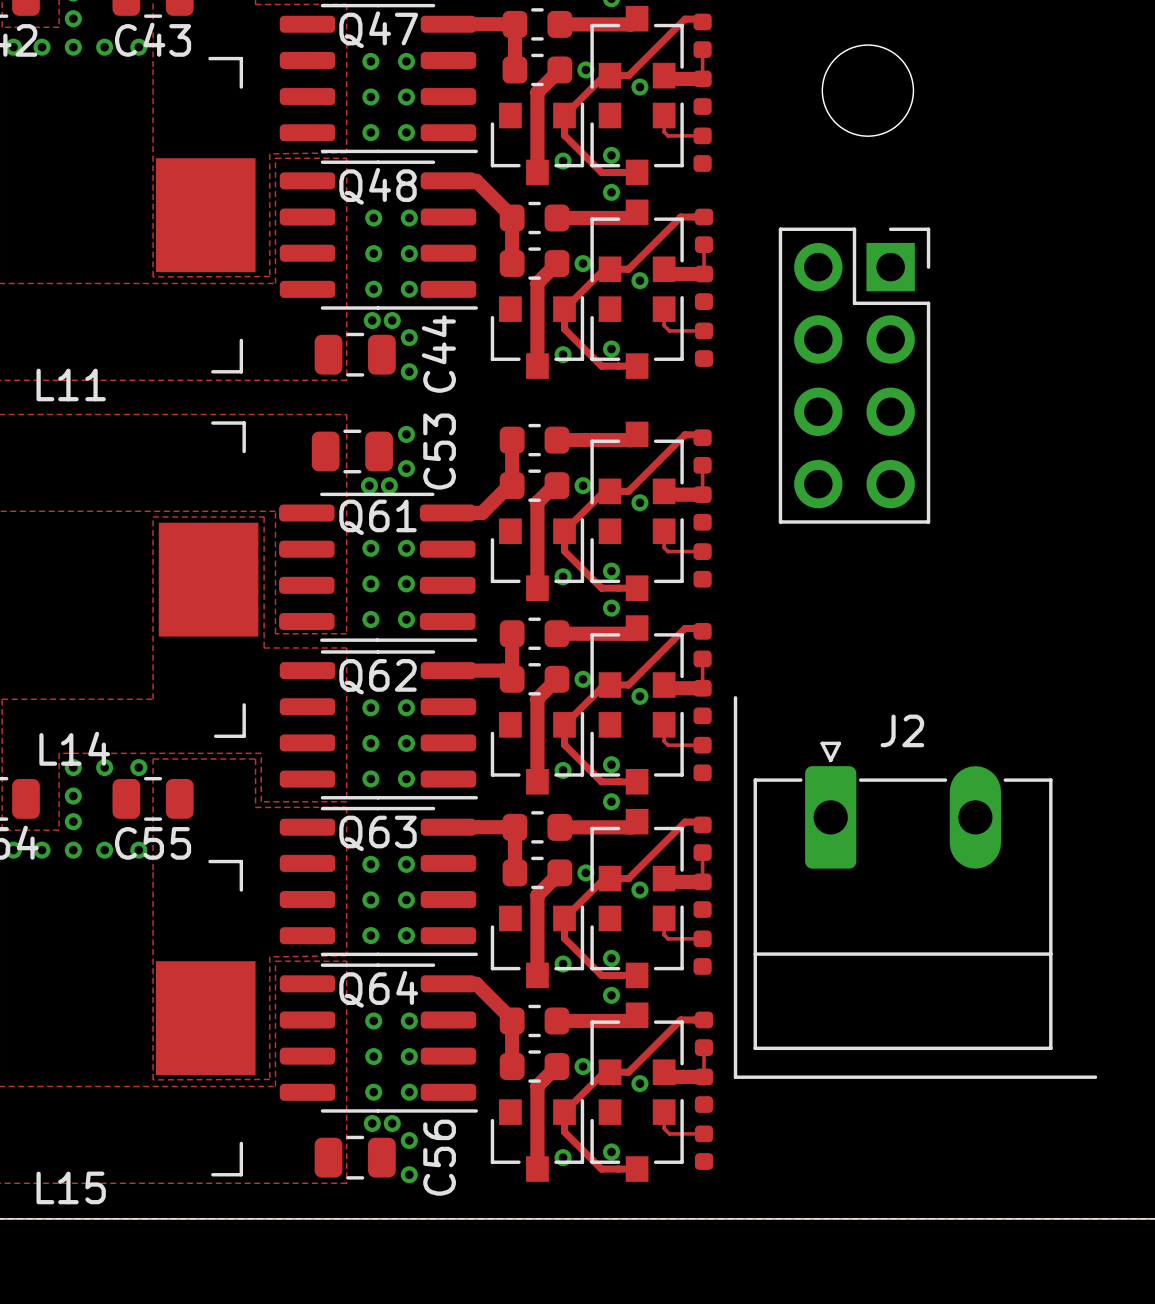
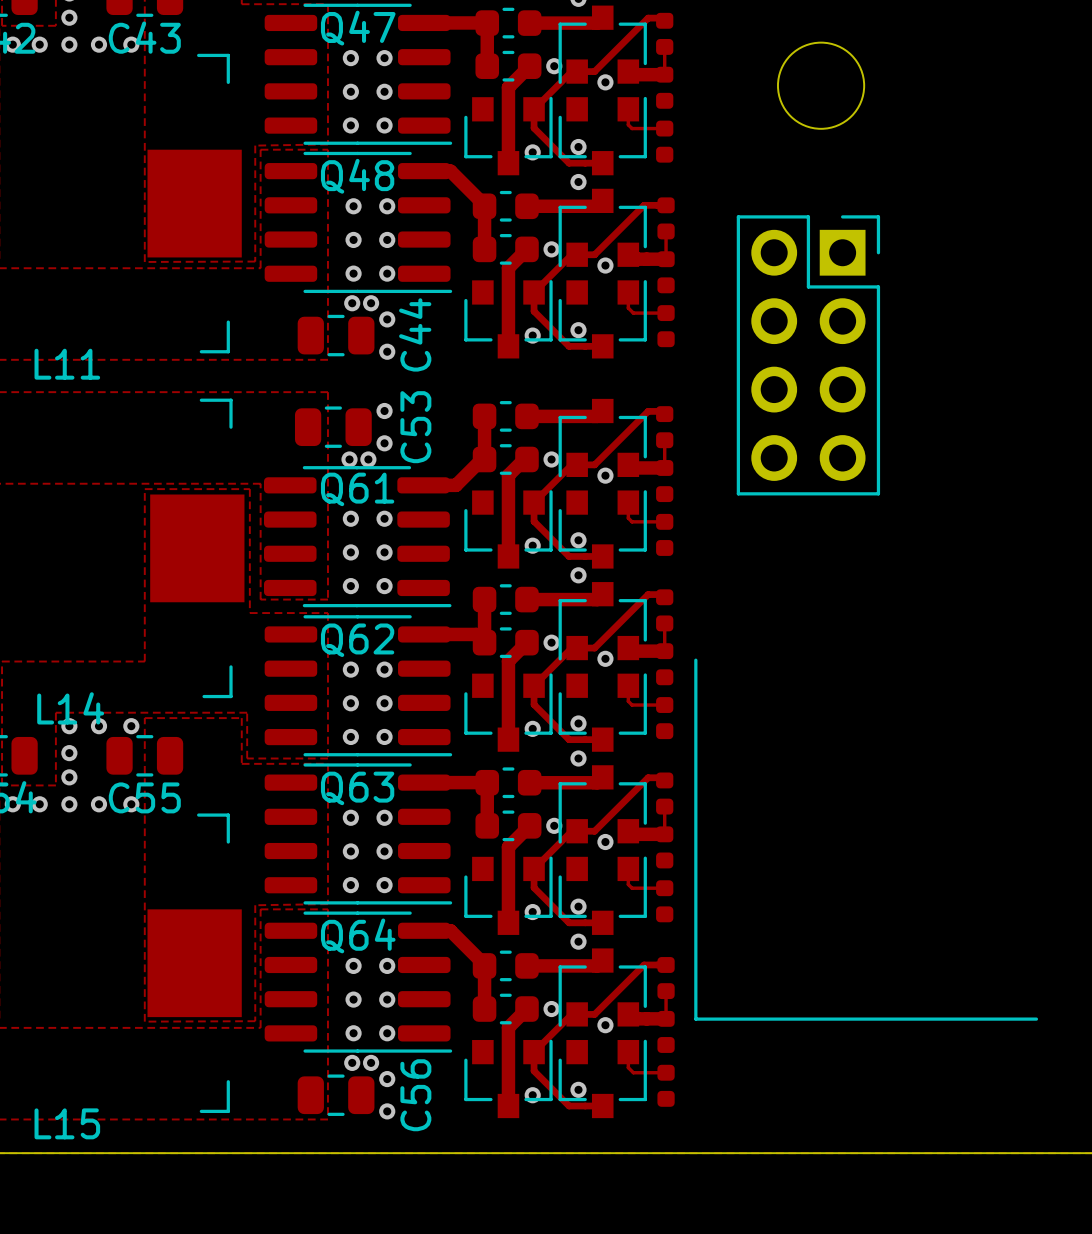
J2: (903, 895) -> none

